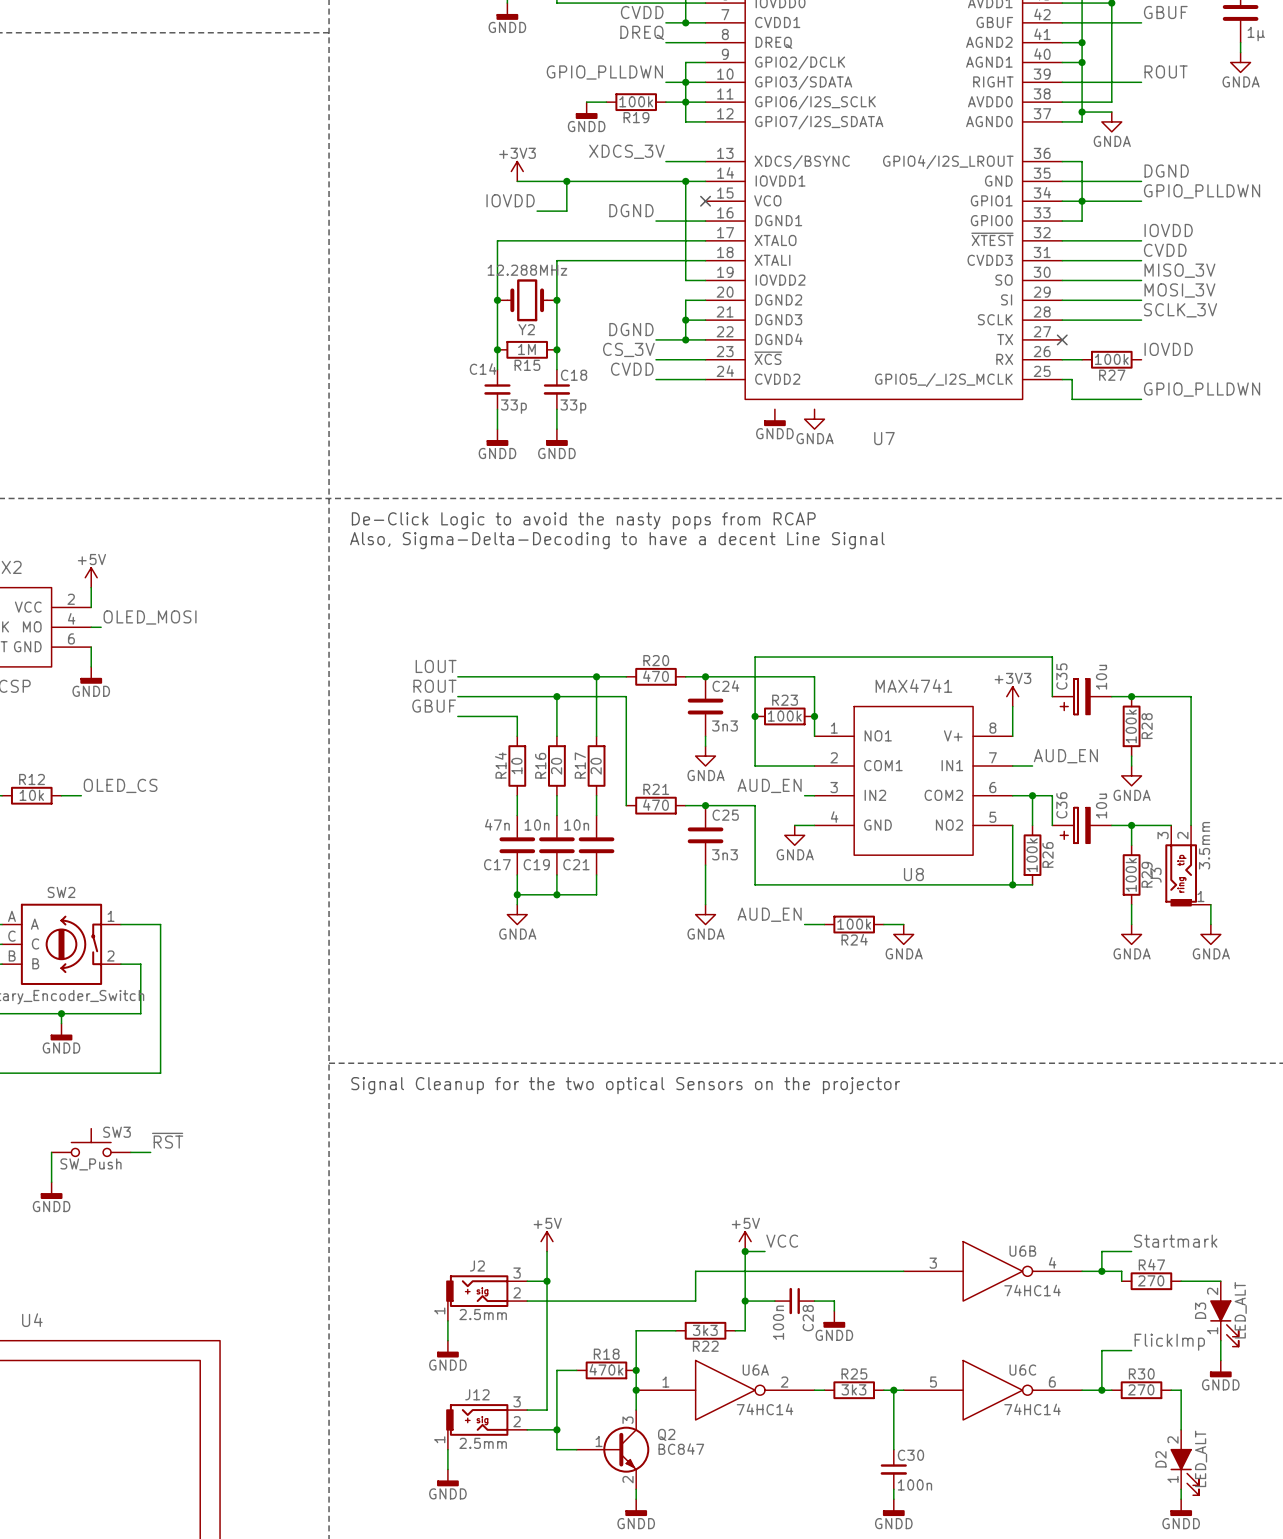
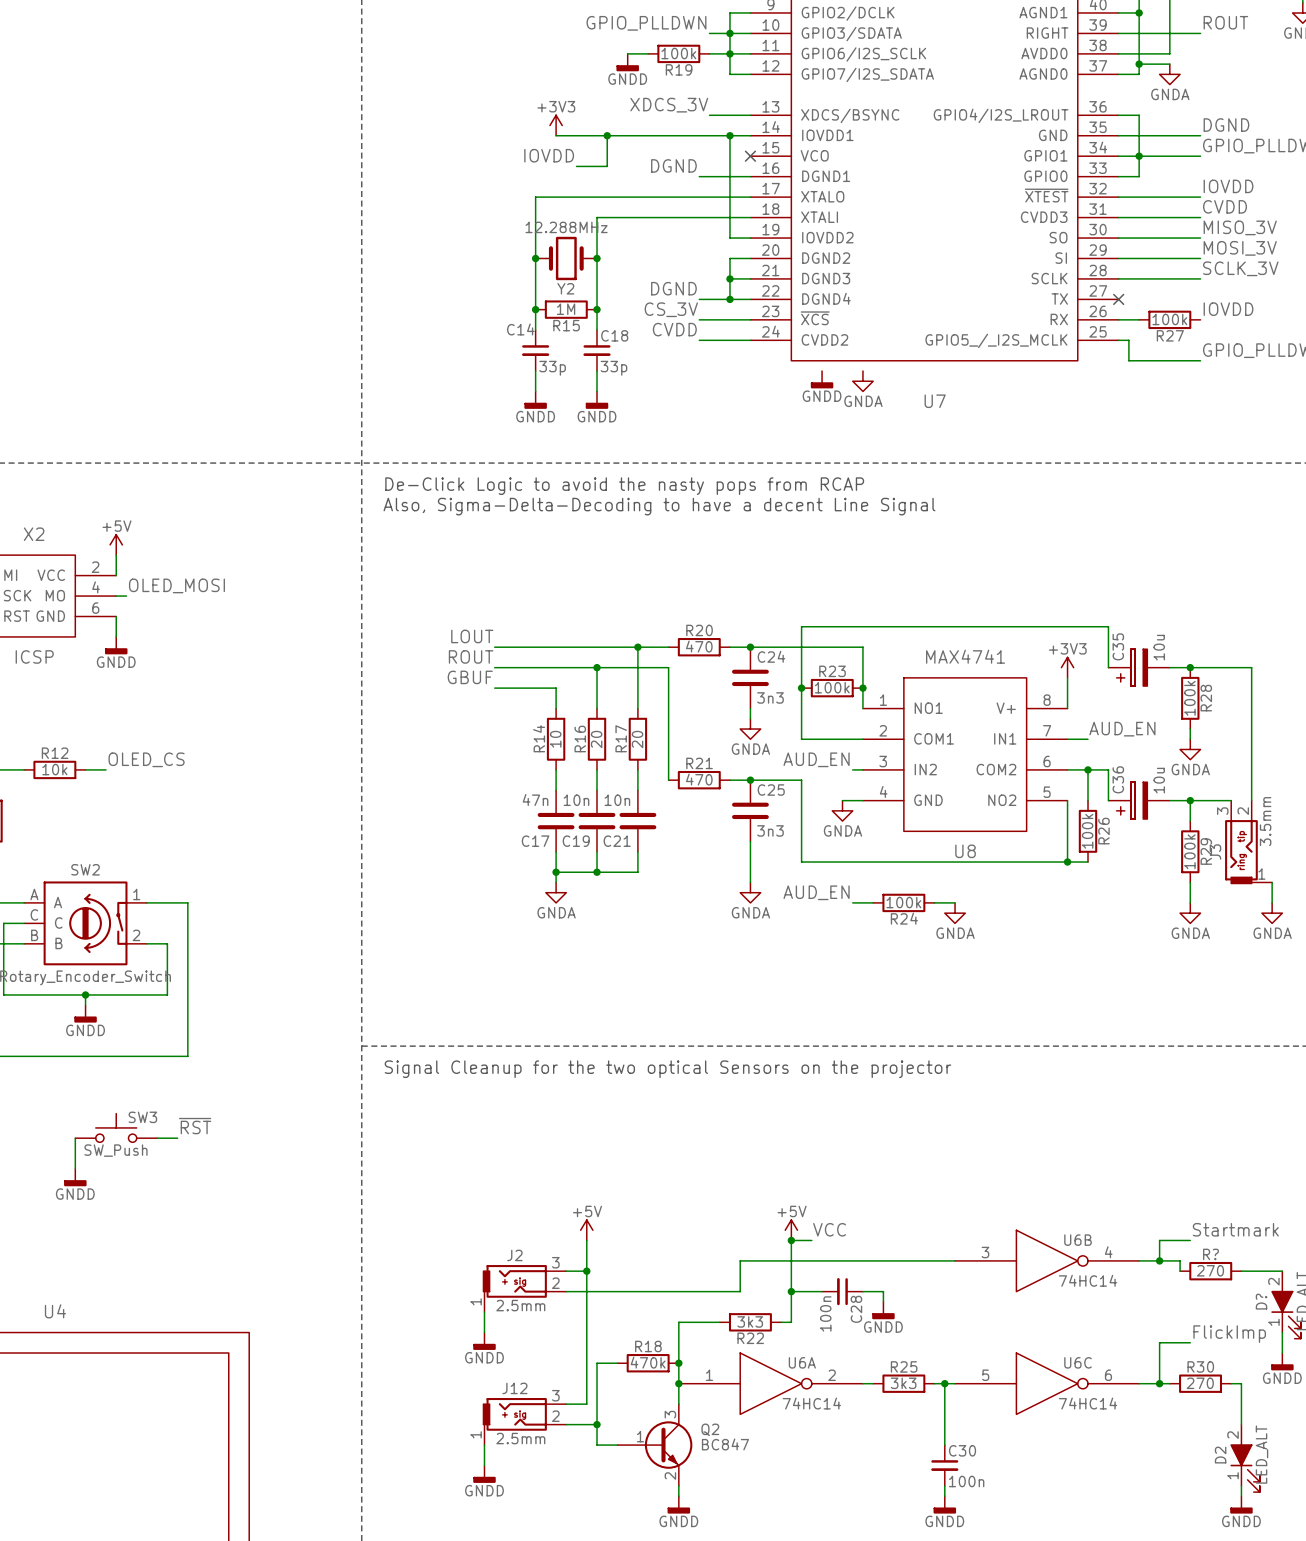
R47 name: R47 (1151, 1264) -> R? (1210, 1254)
D3 name: D3 (1200, 1310) -> D? (1261, 1301)

